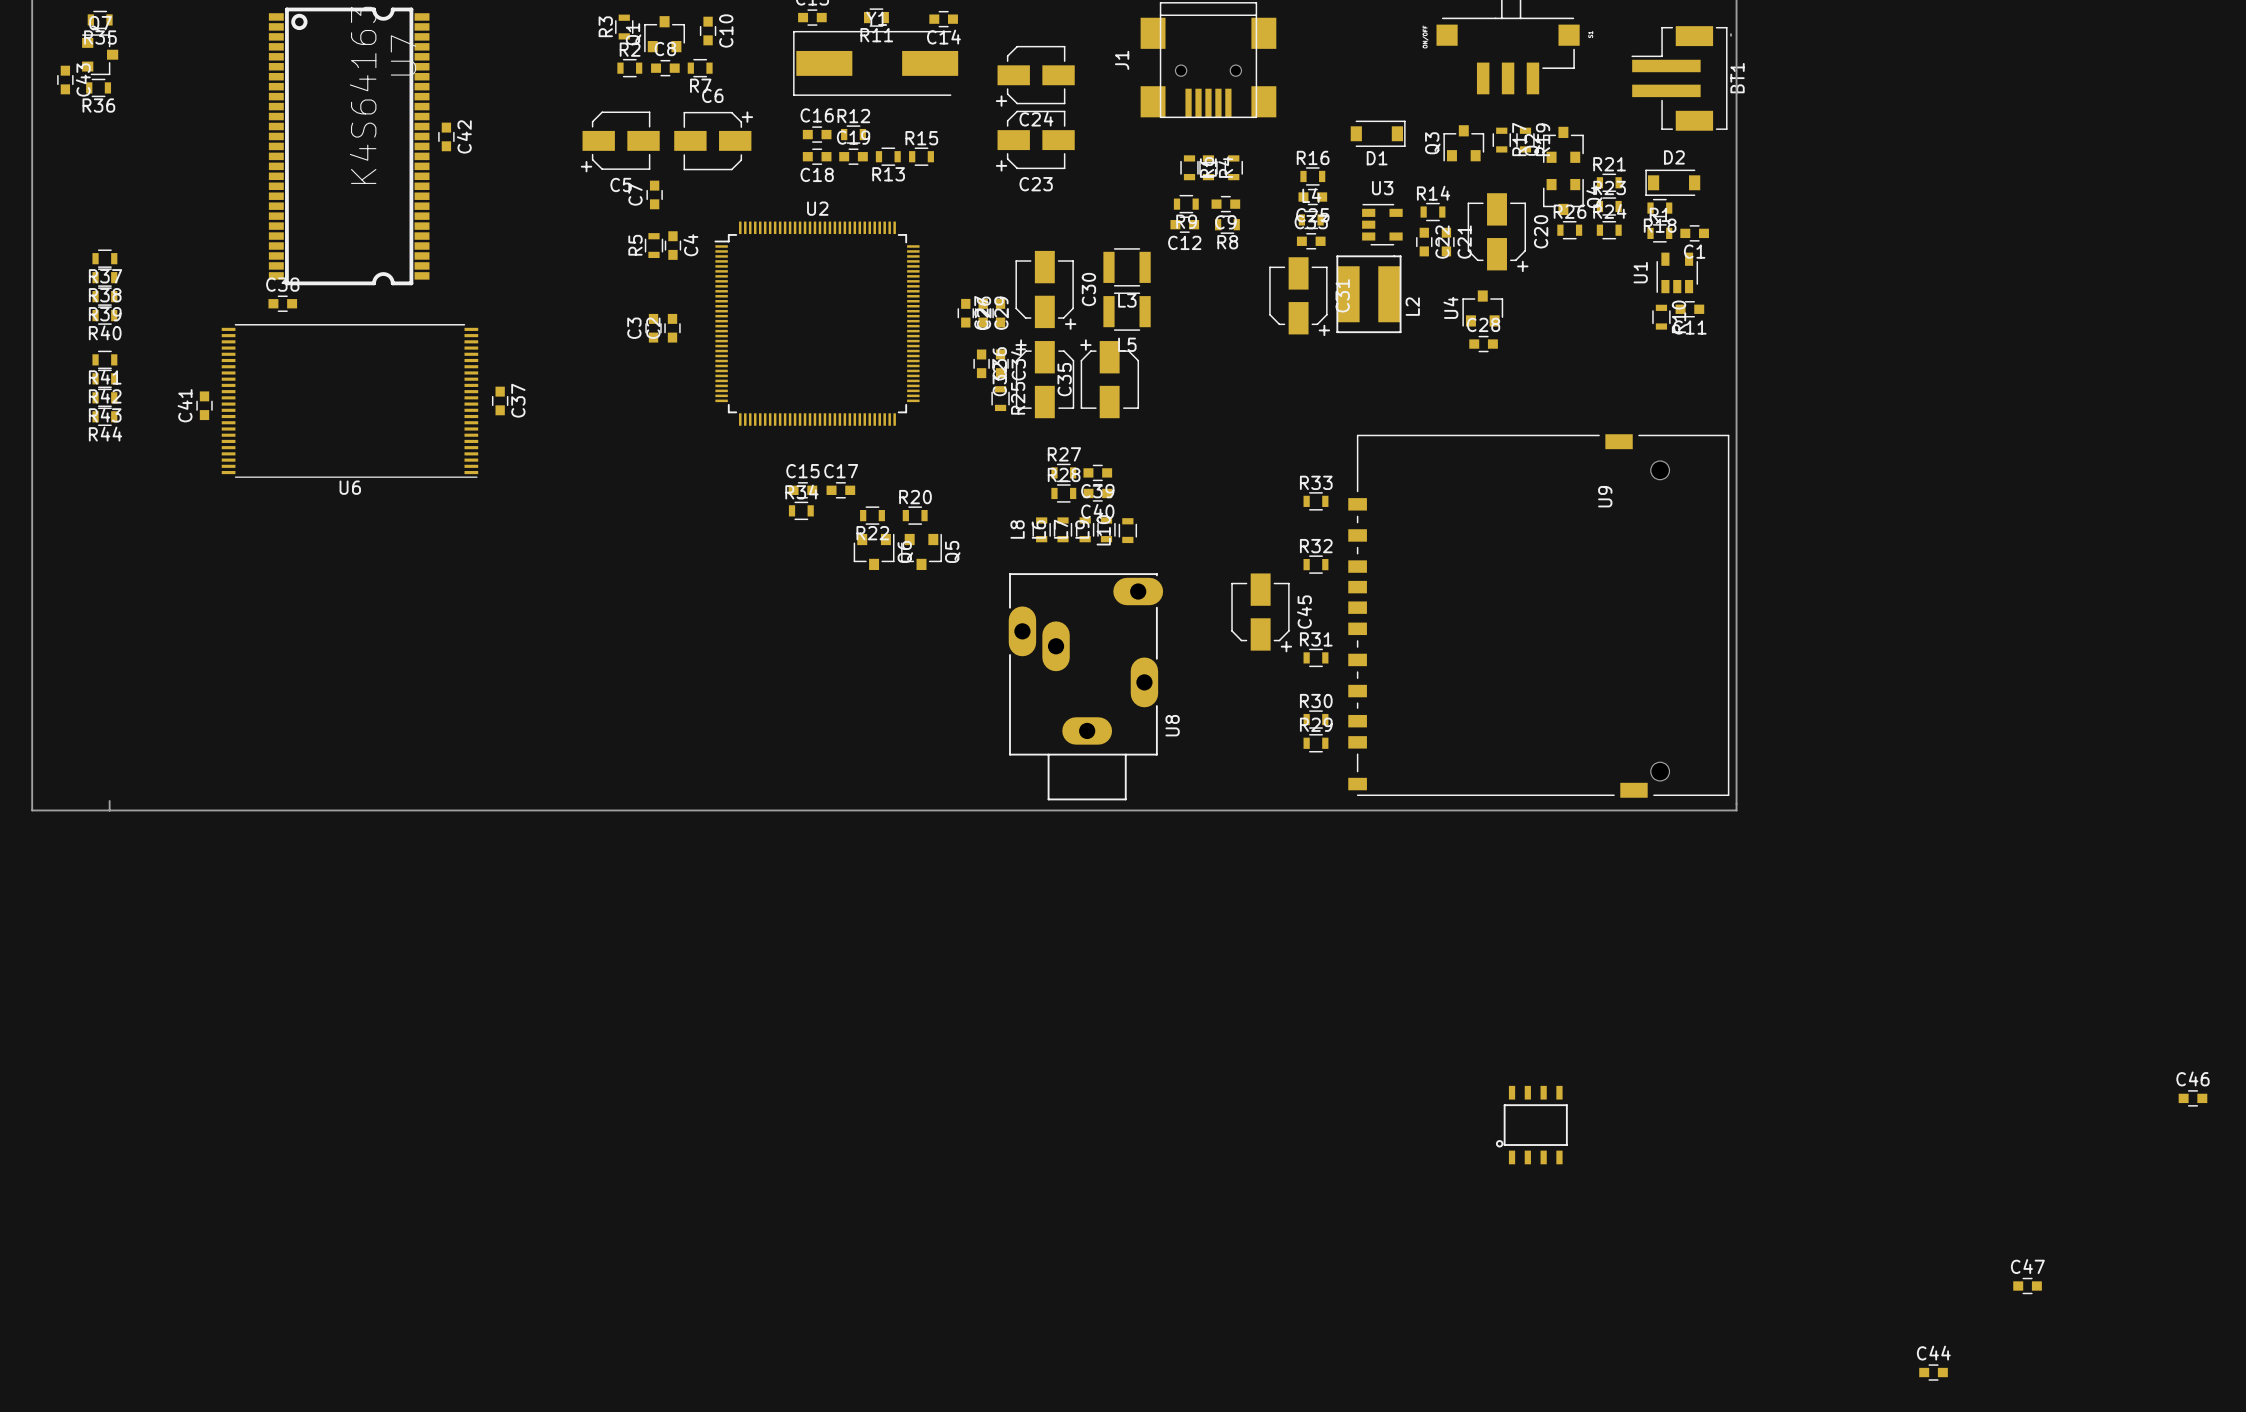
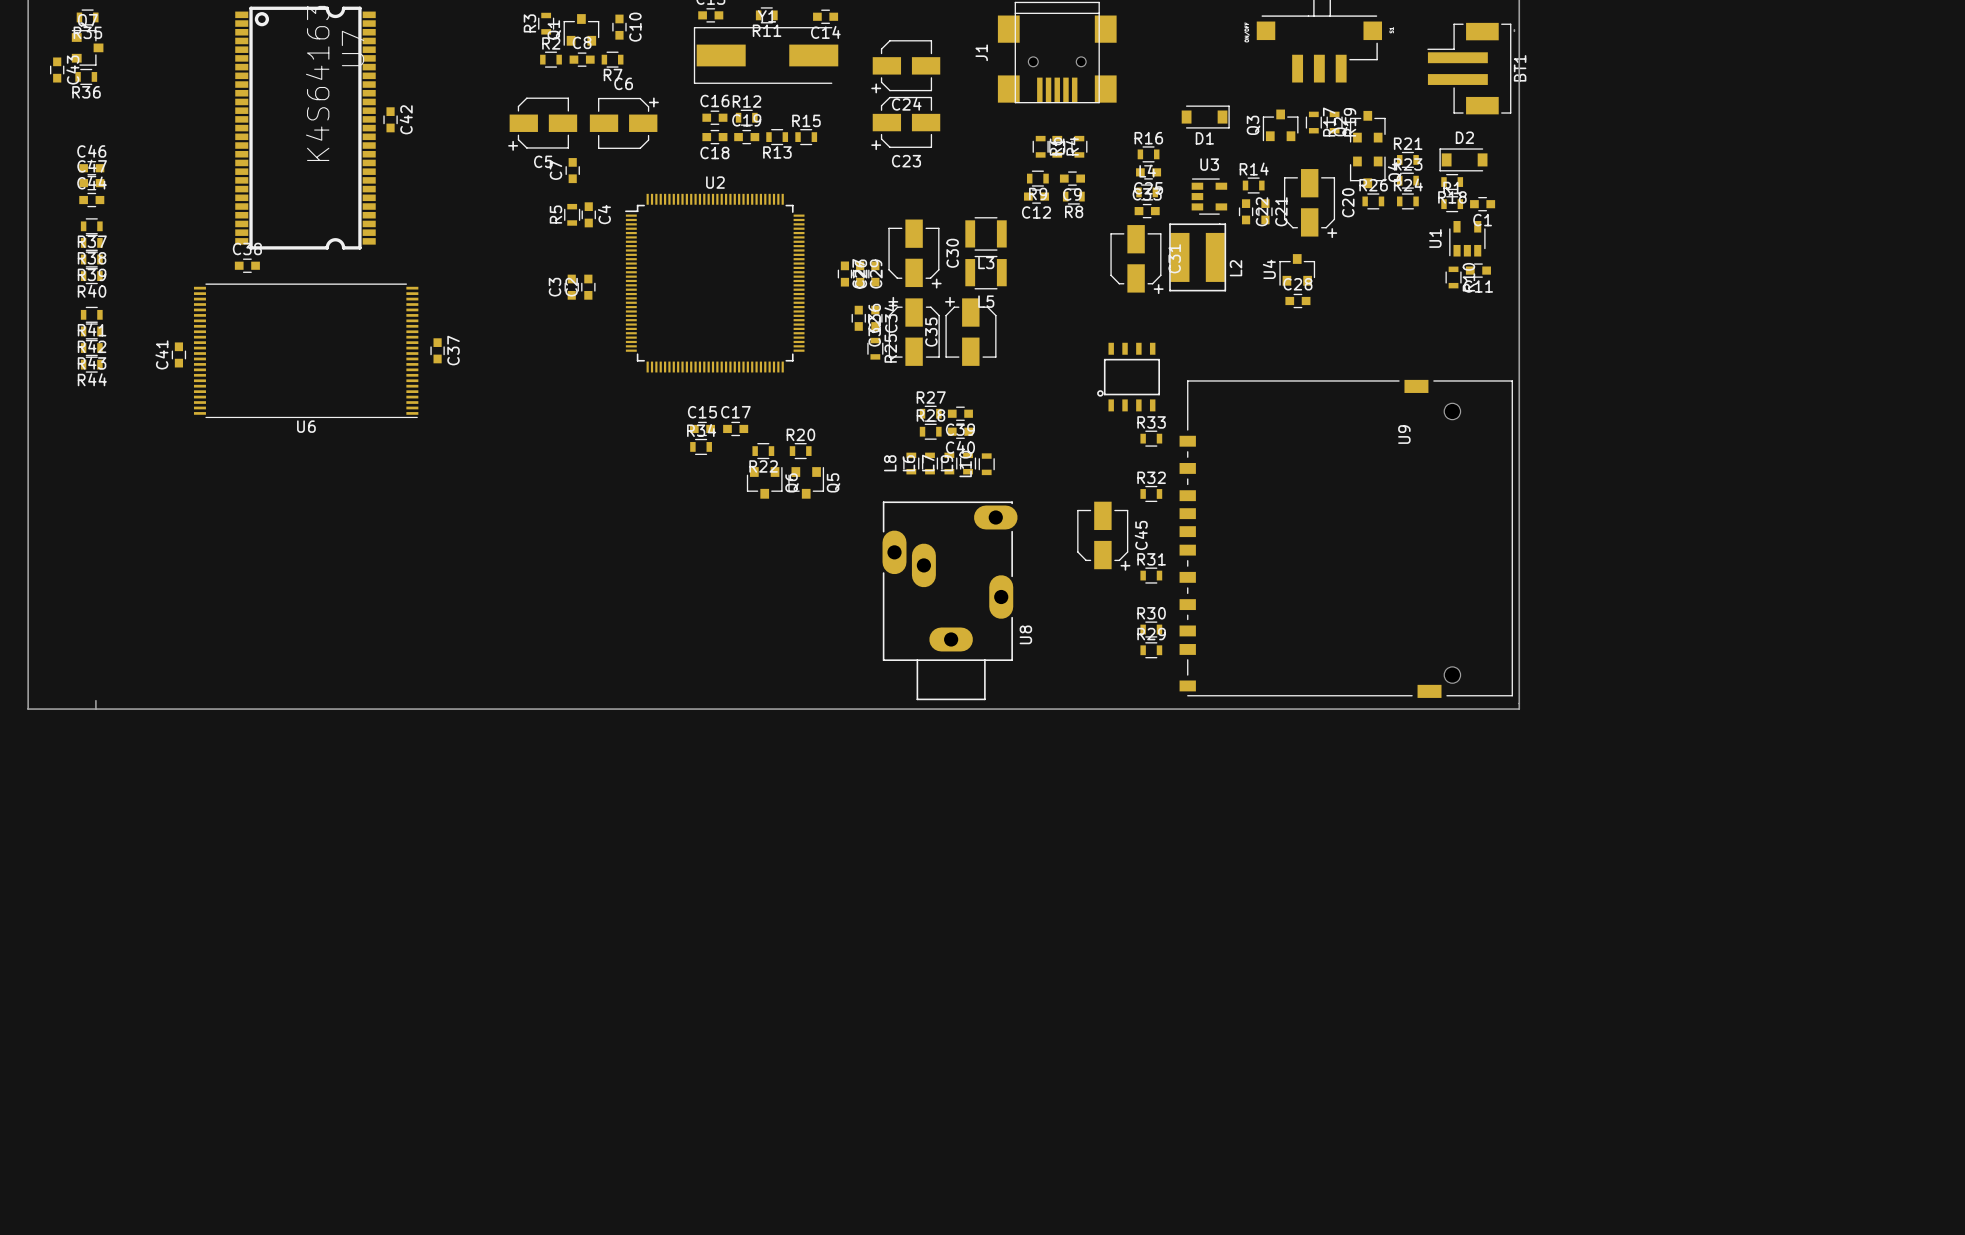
part: none -> (1128, 377)
C46 position: (2192, 1098) -> (91, 168)
part: (1531, 1125) -> none
C47 position: (2027, 1286) -> (91, 183)
C44 position: (1933, 1372) -> (91, 200)

